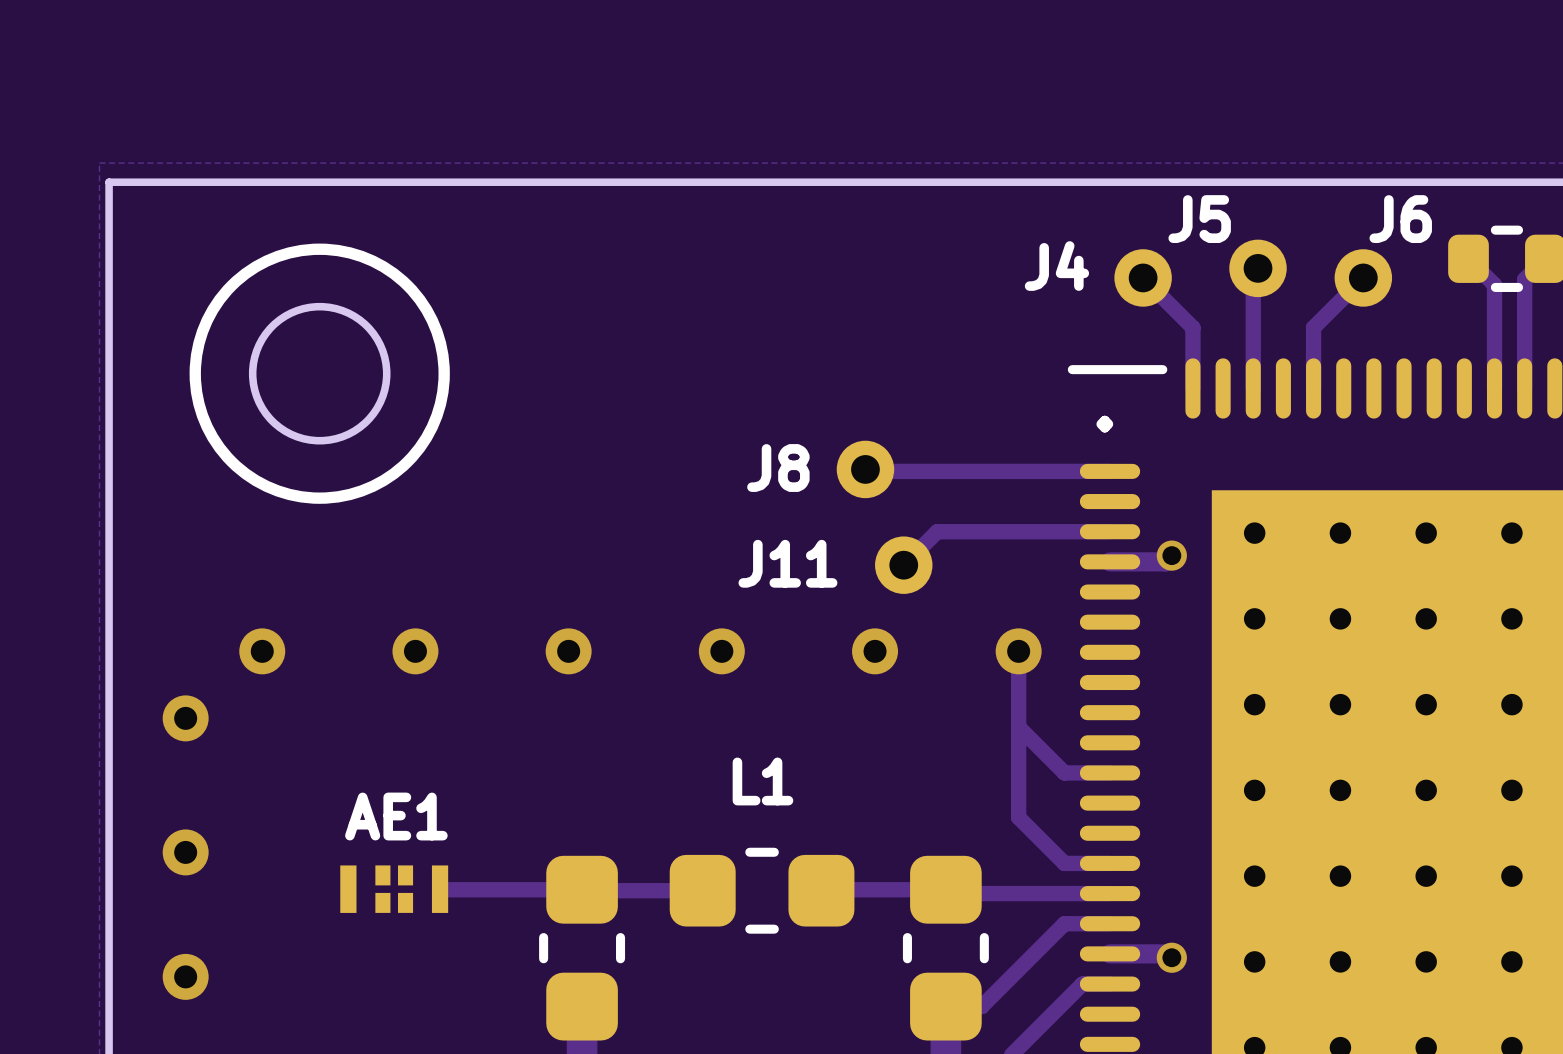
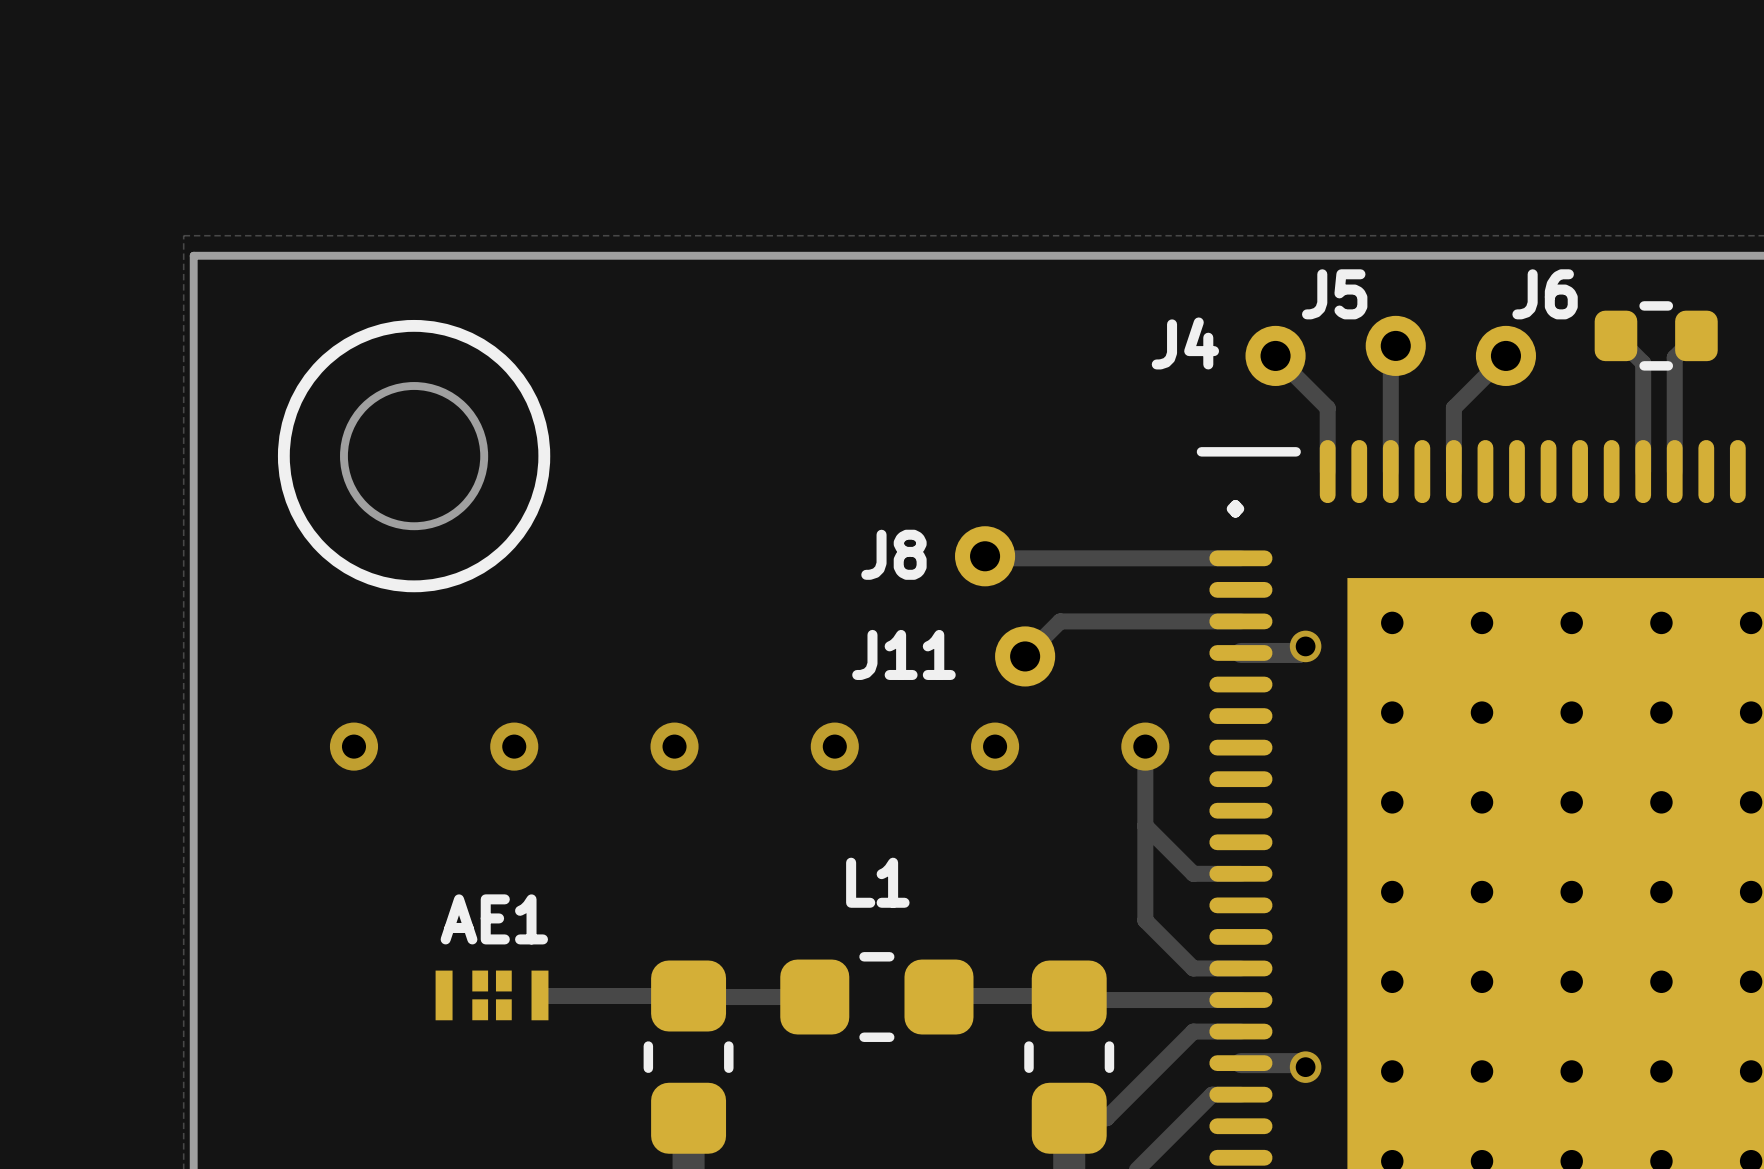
via: (185, 718) -> none
via: (185, 852) -> none
via: (185, 976) -> none

